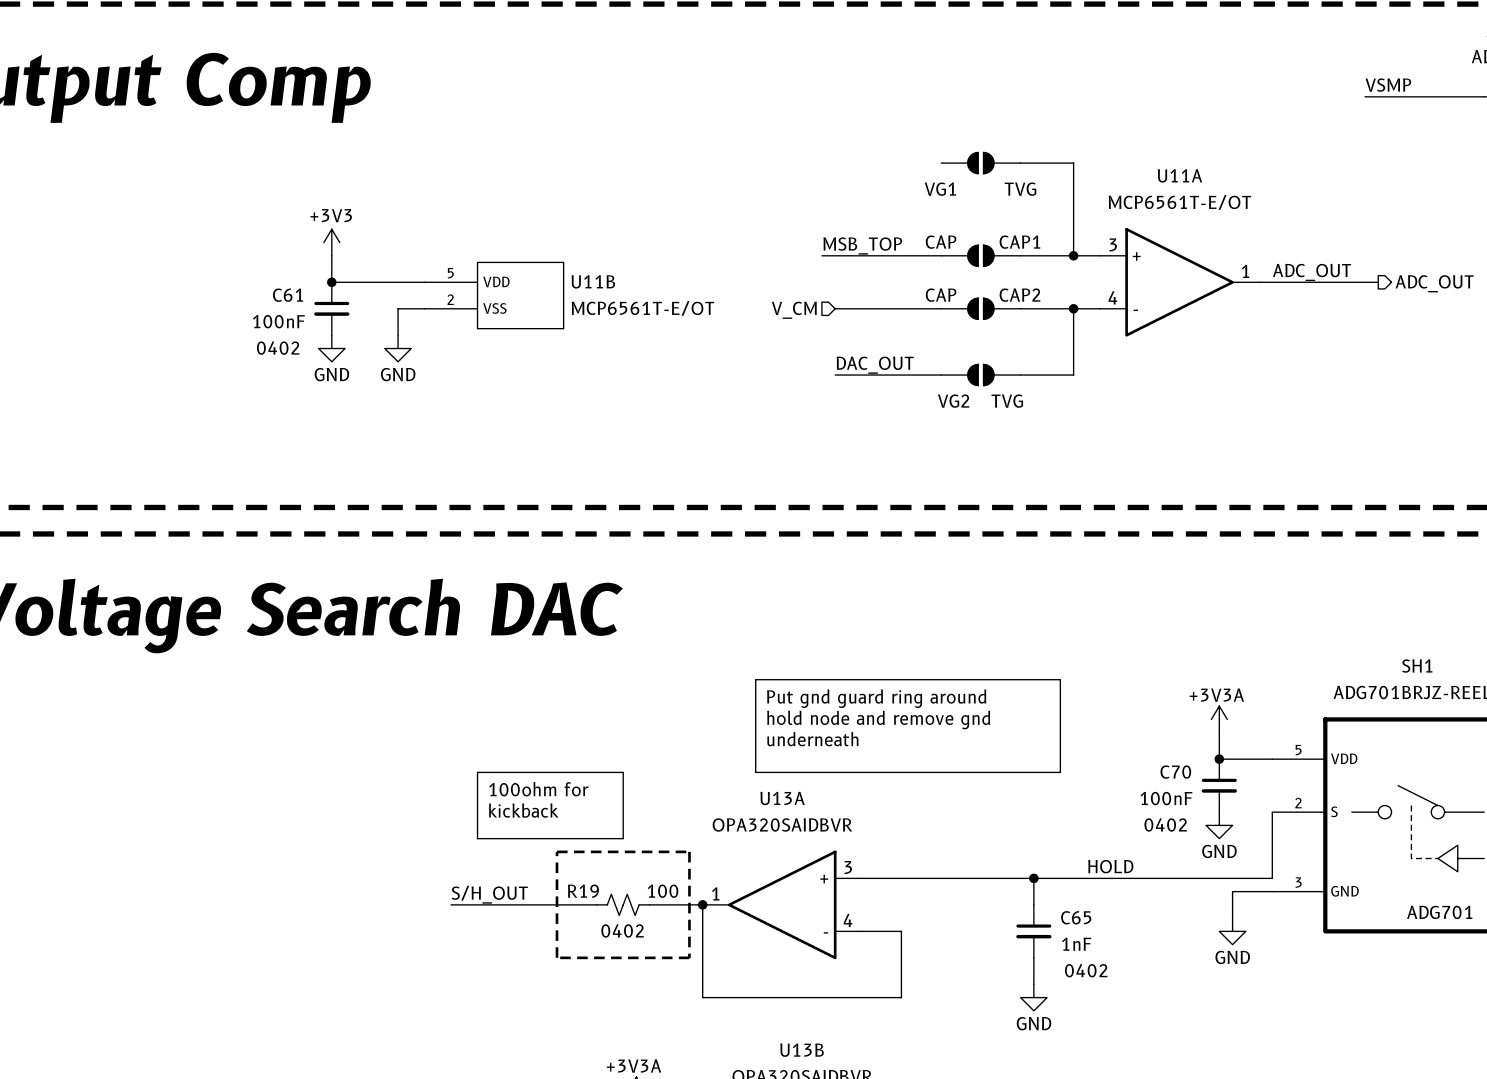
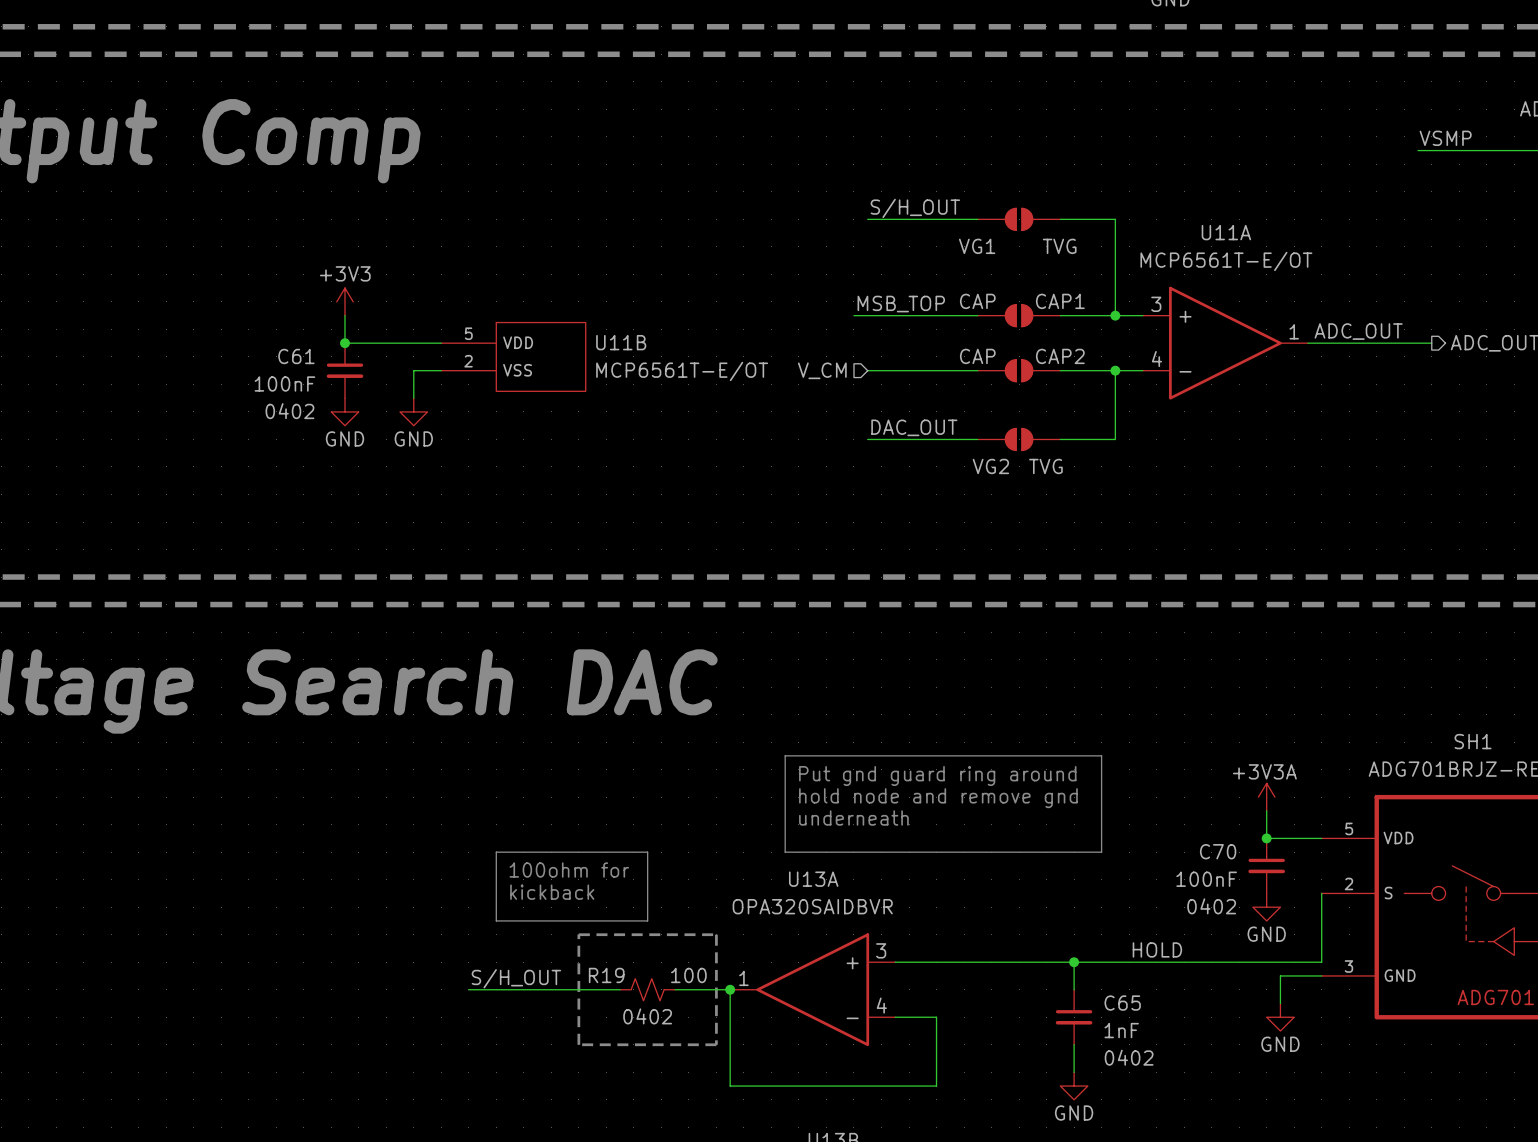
label: none -> S/H_OUT (915, 208)
wire: none -> (867, 219) (977, 219)

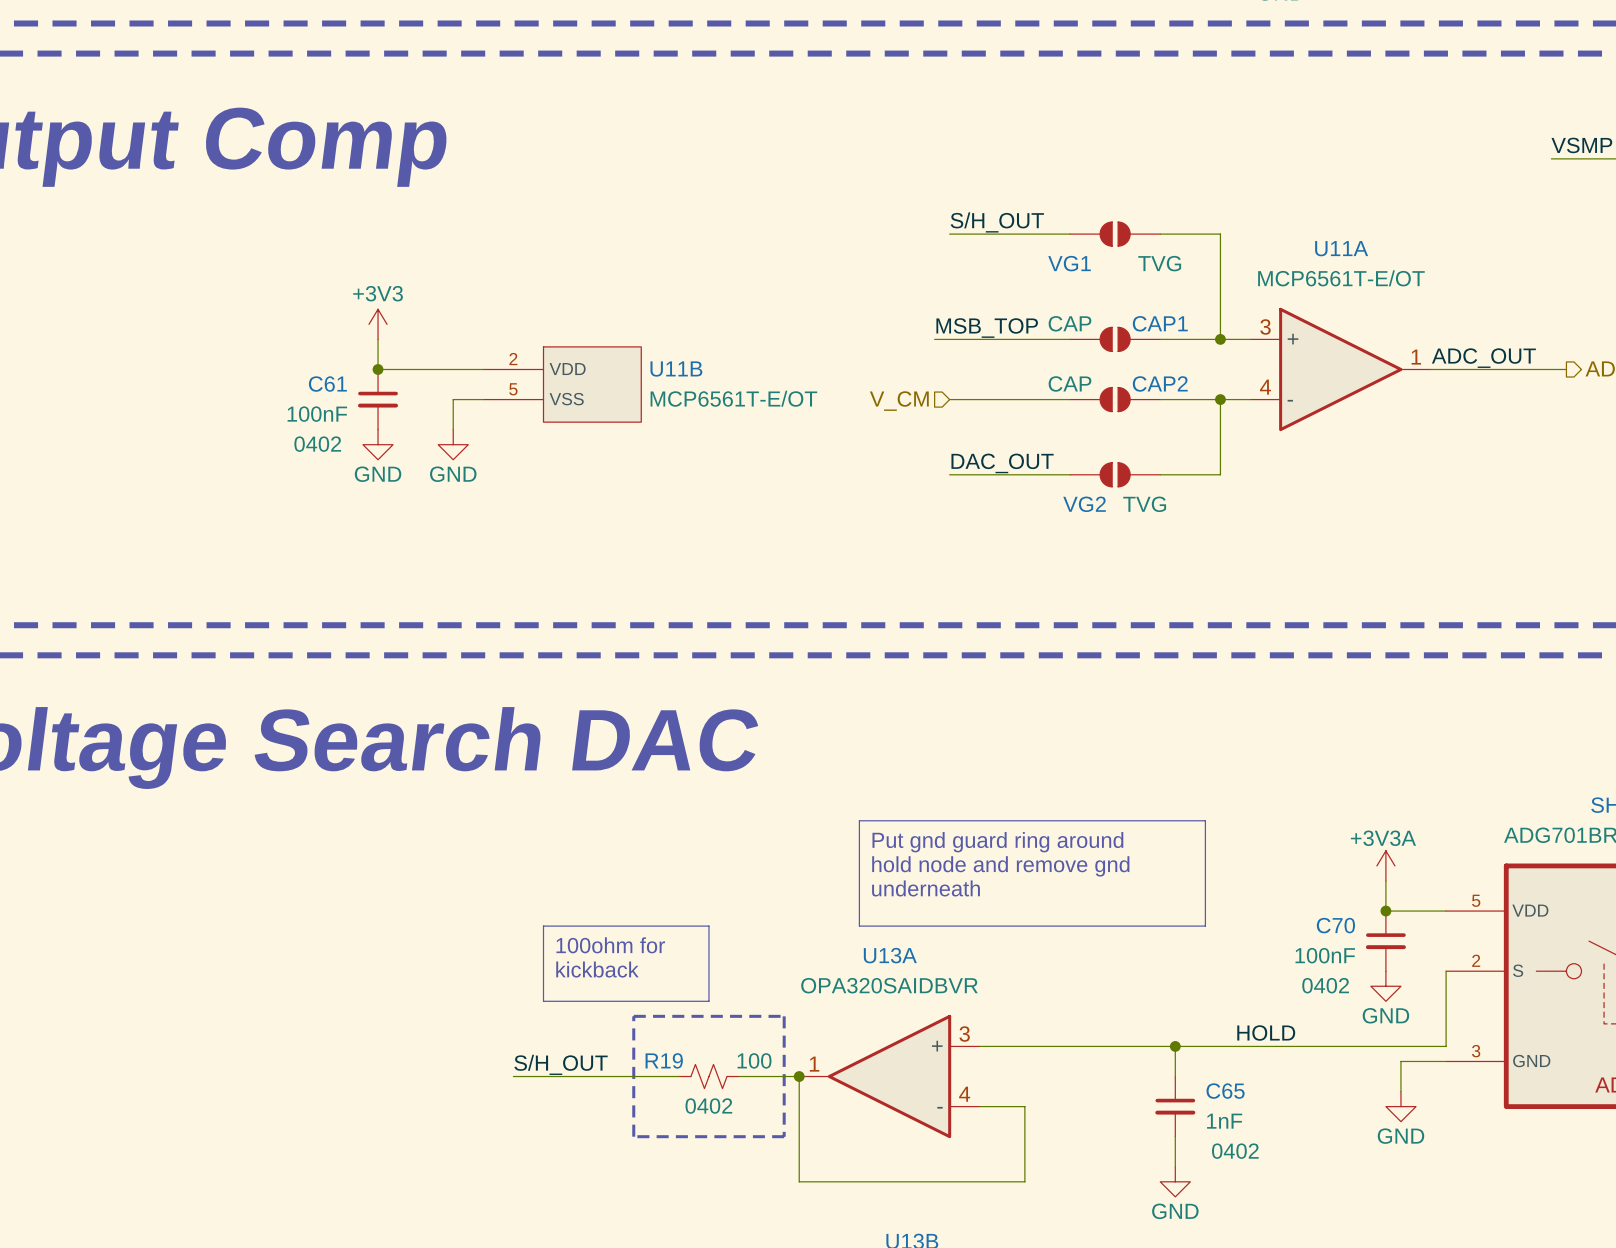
U11B pin number: 5 (468, 333) -> 2 (513, 359)
U11B pin number: 2 (468, 361) -> 5 (513, 389)

